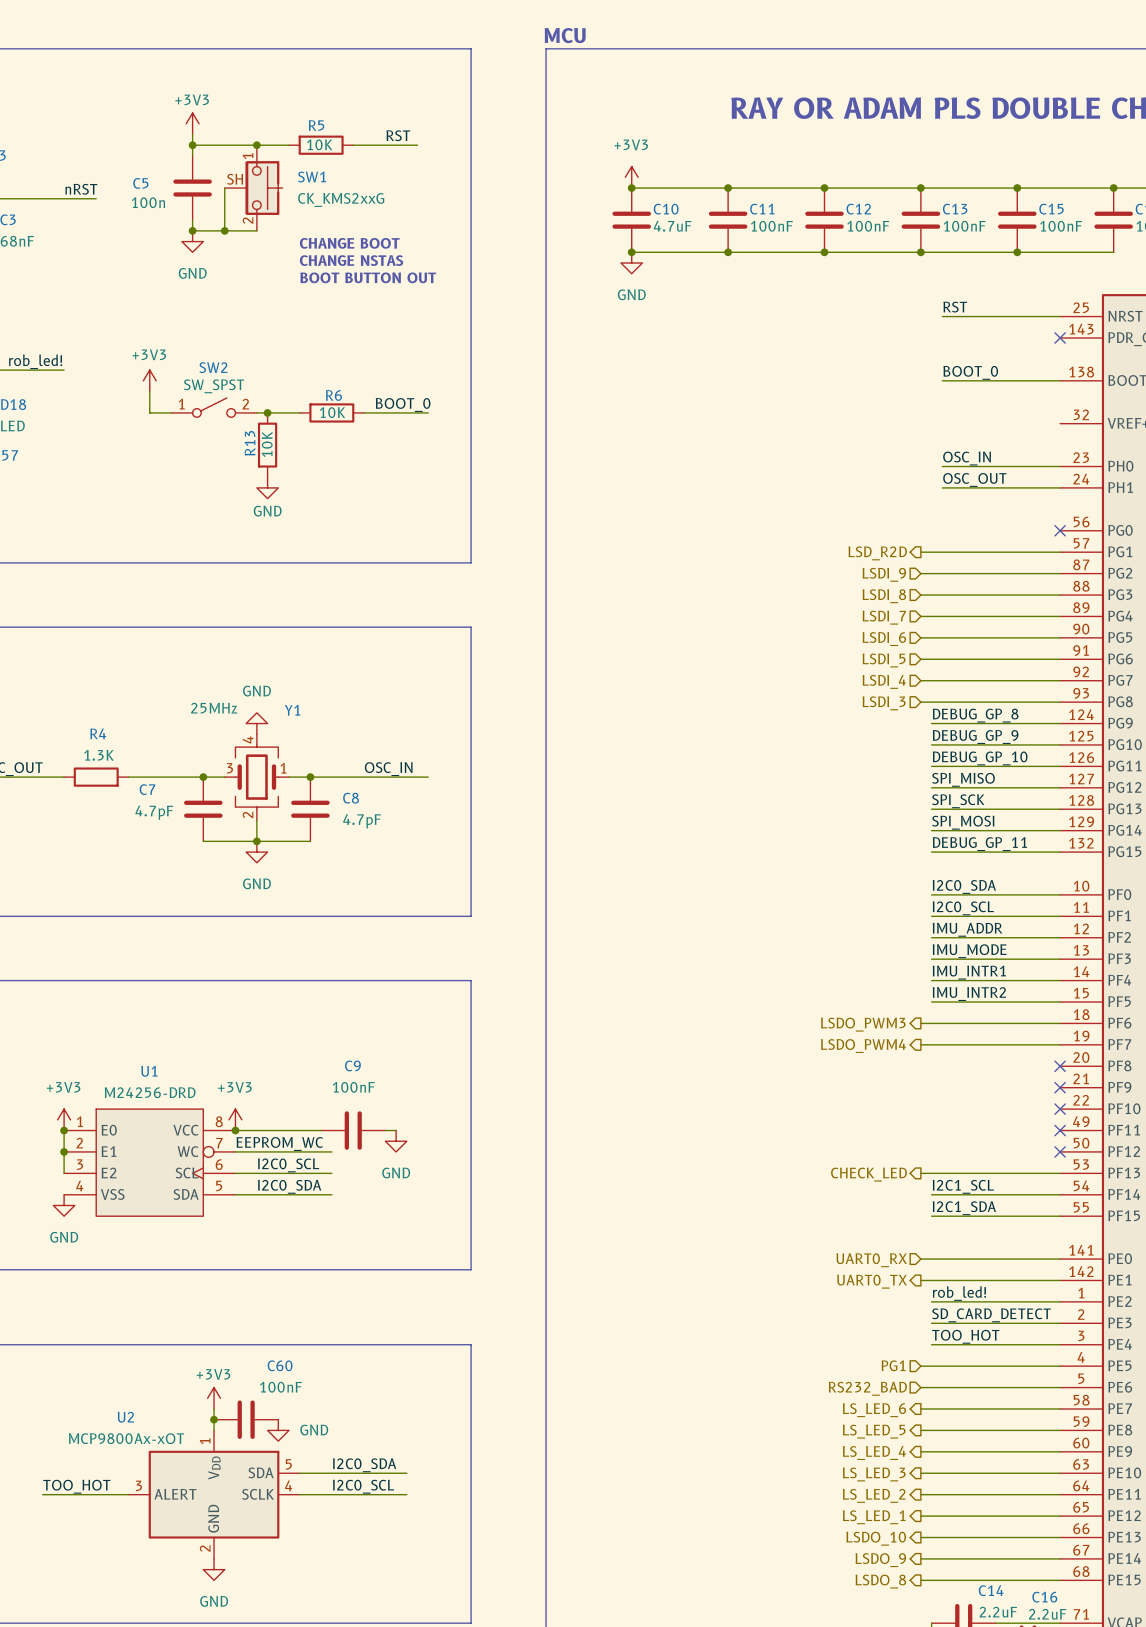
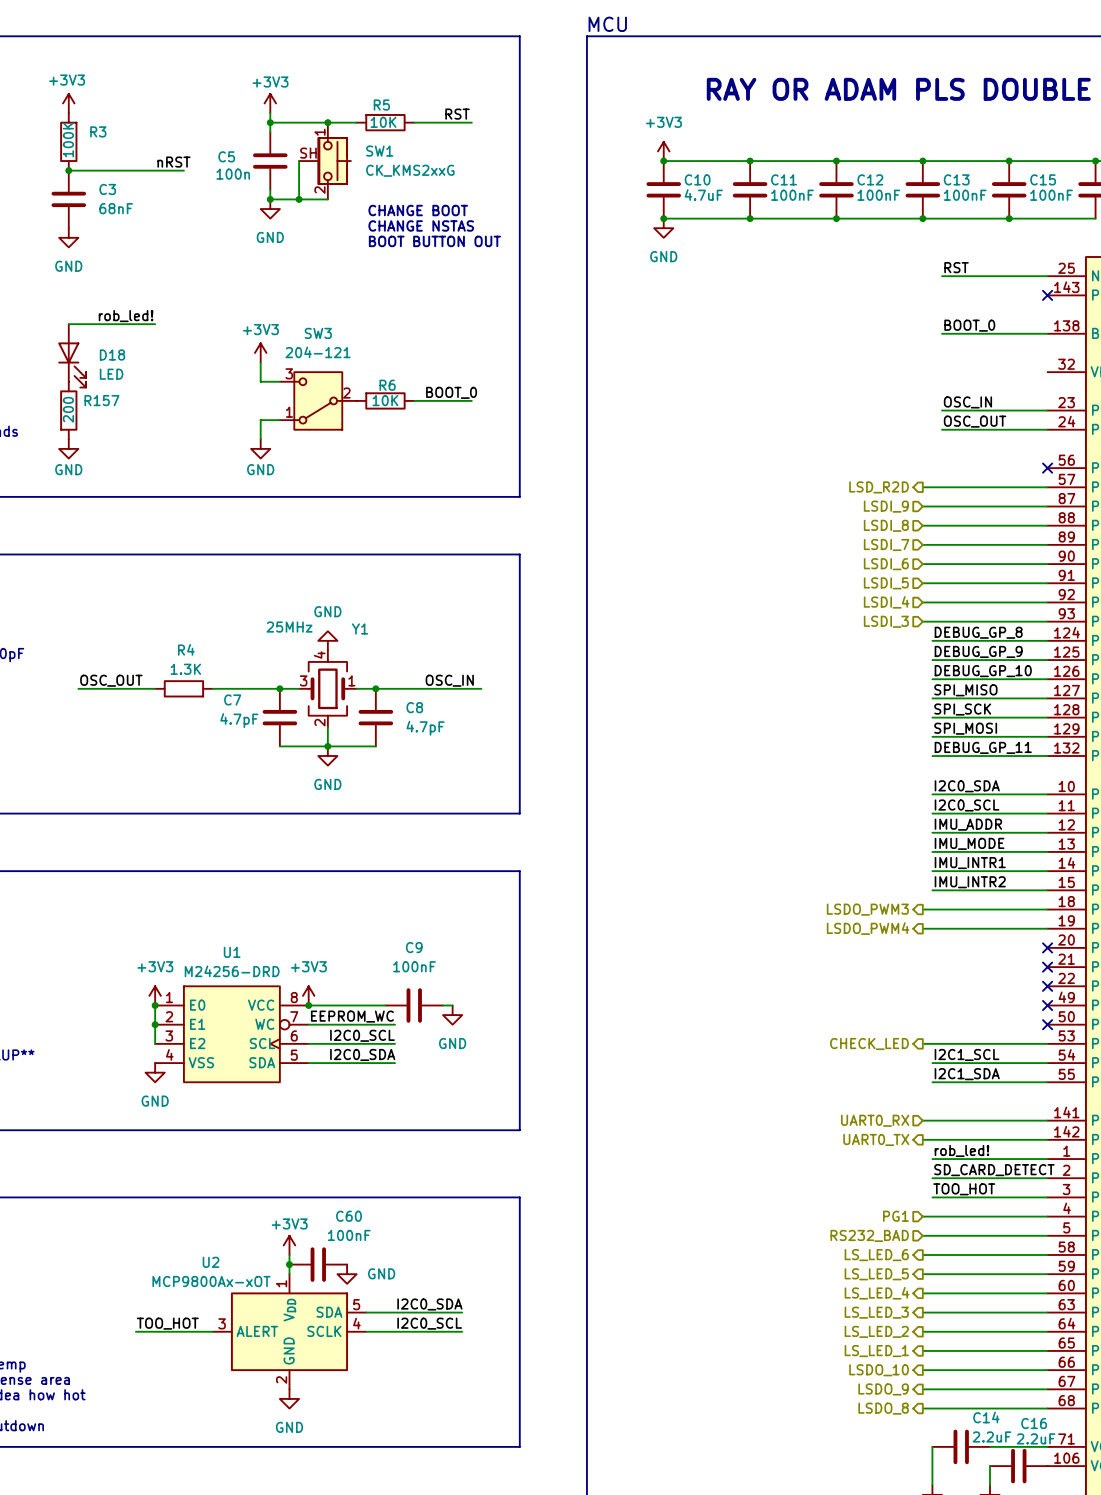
power symbol position: +3V3 (149, 380) -> +3V3 (260, 352)
wire: (149, 391) (149, 412) (171, 412) -> (260, 362) (260, 381) (279, 381)
label position: BOOT_0 (403, 405) -> BOOT_0 (451, 392)
SW2: SW_SPST (214, 407) -> none
wire: (256, 412) (299, 412) -> none
junction: (267, 412) -> none
R6 position: (331, 412) -> (385, 400)
wire: (363, 412) (428, 412) -> (414, 400) (471, 400)
R13: 10K (267, 445) -> none
SW3: none -> 204-121 (318, 400)
wire: none -> (279, 420) (260, 420) (260, 439)
power symbol position: GND (267, 487) -> GND (260, 448)

